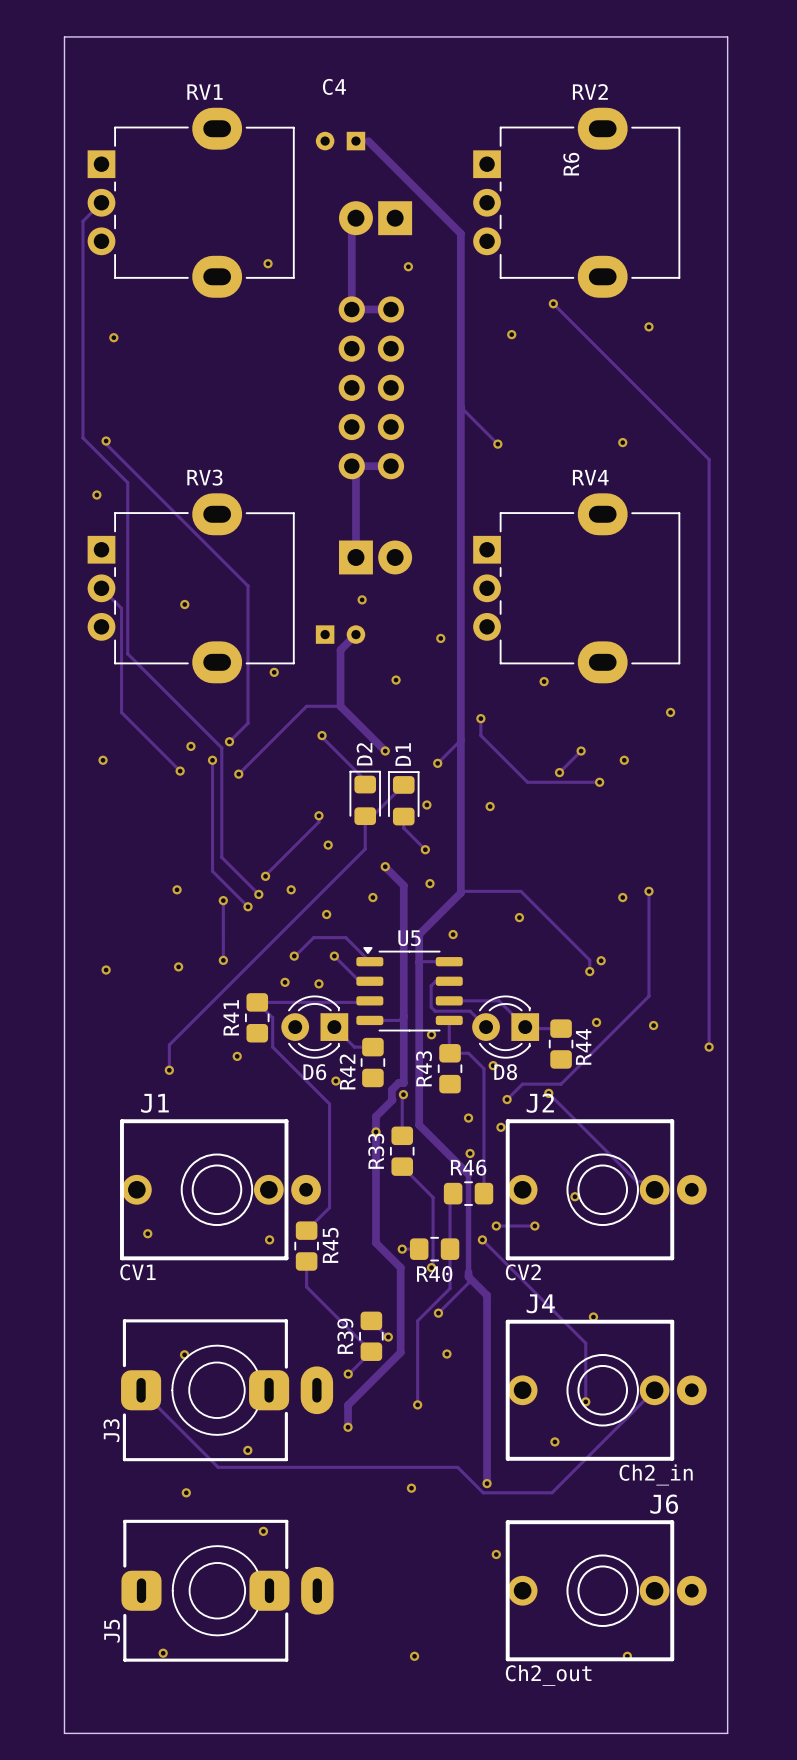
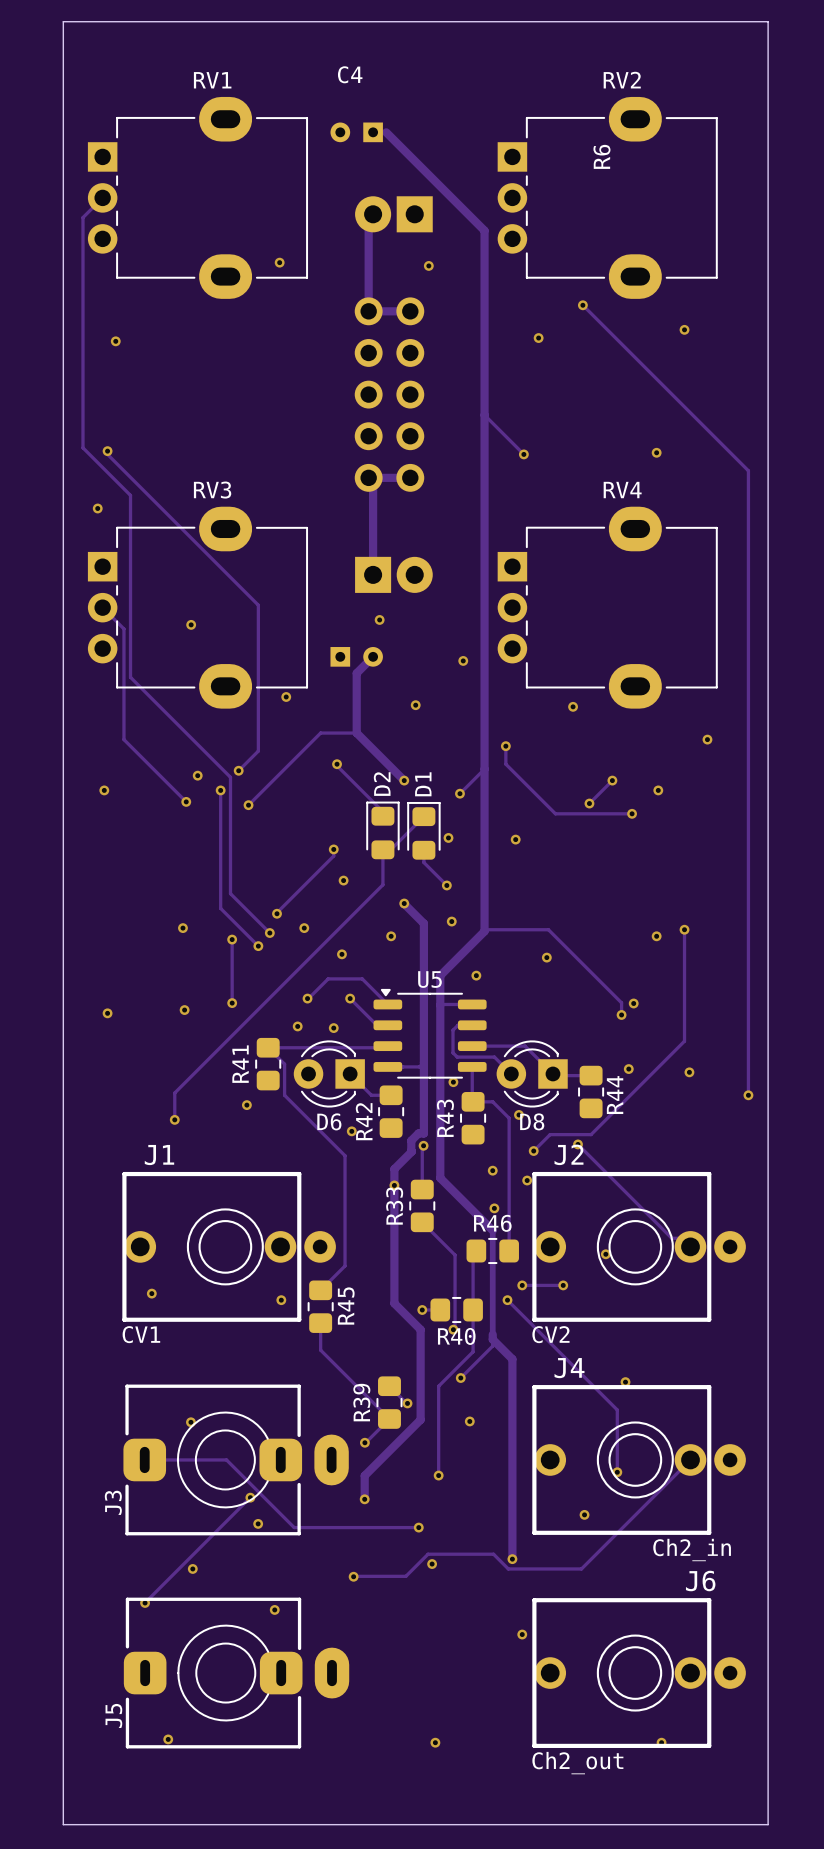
track: (141, 1390) (218, 1467) (457, 1467) (469, 1478) -> (144, 1459) (226, 1459) (294, 1527) (418, 1527)
track: none -> (250, 1497) (145, 1602)
via: none -> (250, 1497)
via: none -> (418, 1527)
track: none -> (493, 1554) (428, 1554) (405, 1576) (353, 1576)
via: none -> (353, 1576)
via: none -> (145, 1602)

